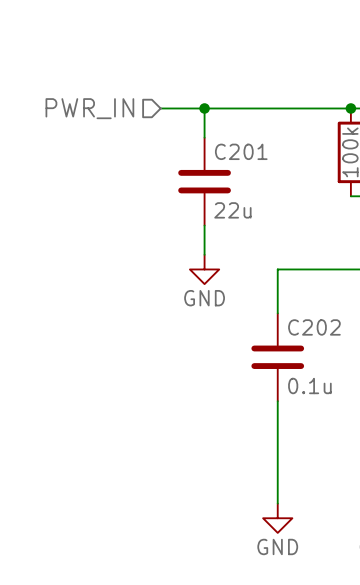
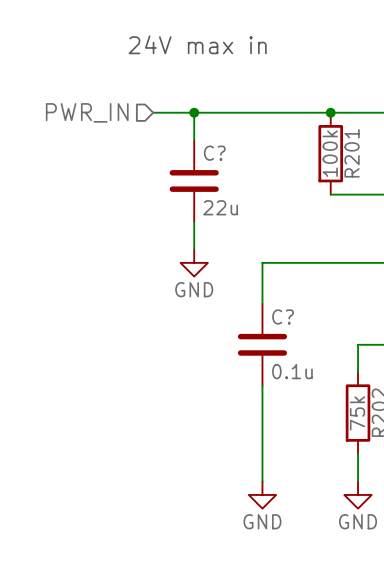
text: none -> 24V max in (197, 44)
C201 name: C201 (241, 151) -> C? (214, 153)
C202 name: C202 (314, 327) -> C? (283, 316)

